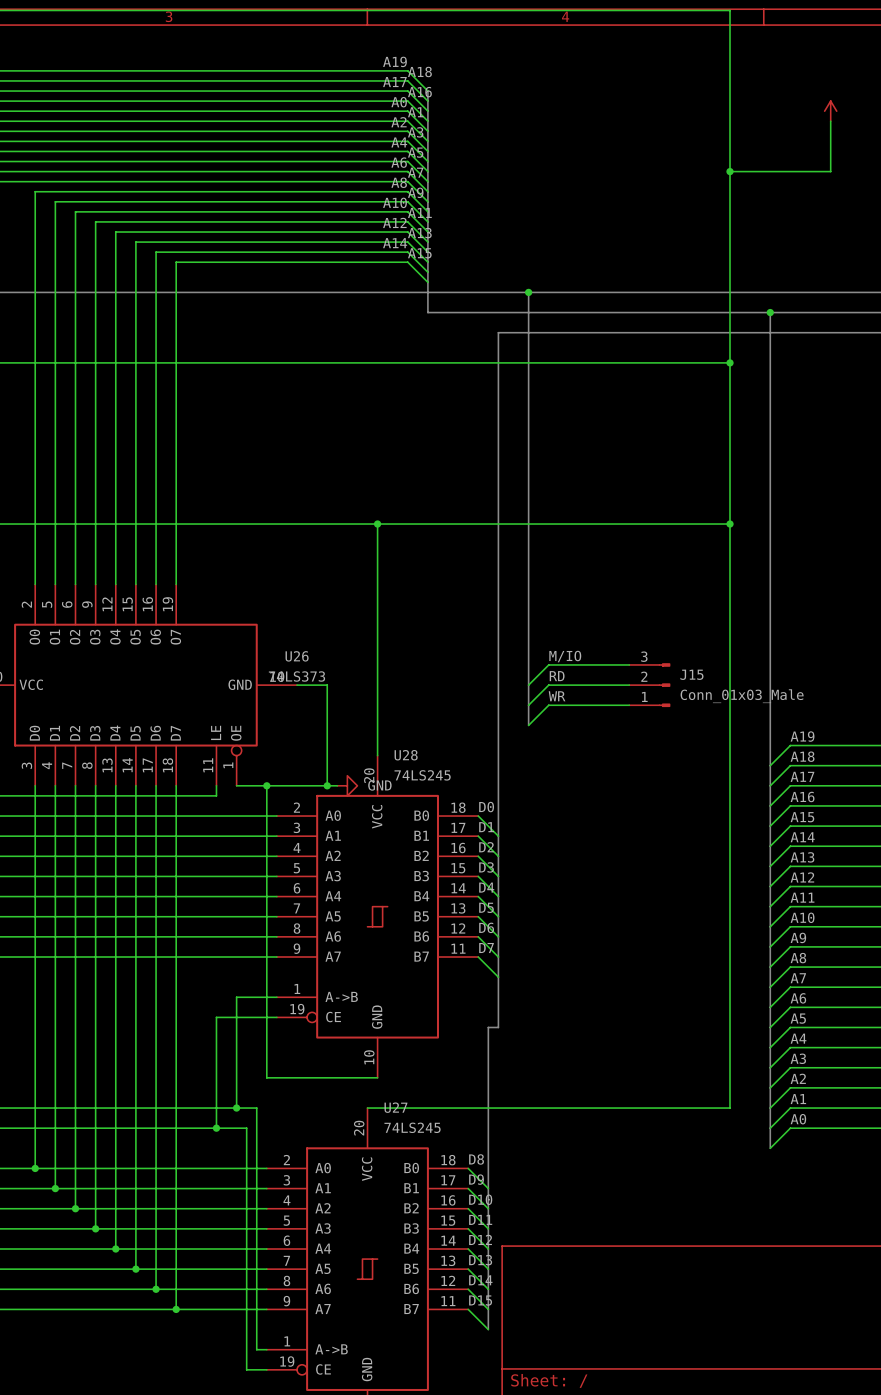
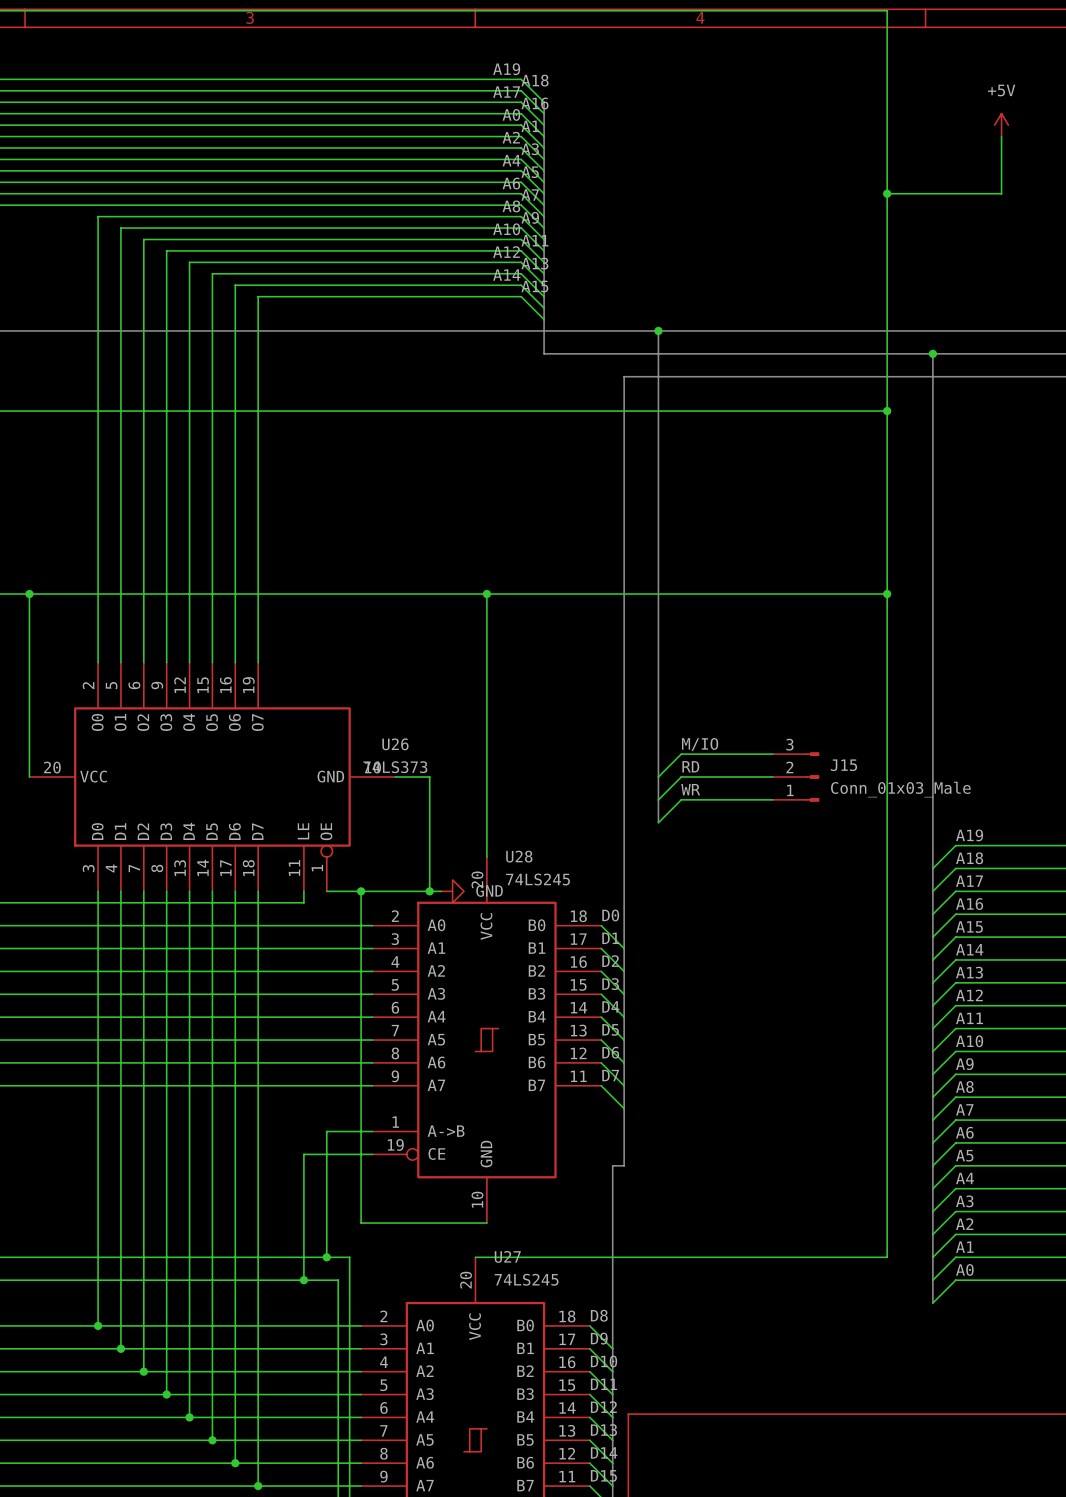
power symbol text: none -> +5V (1001, 90)

